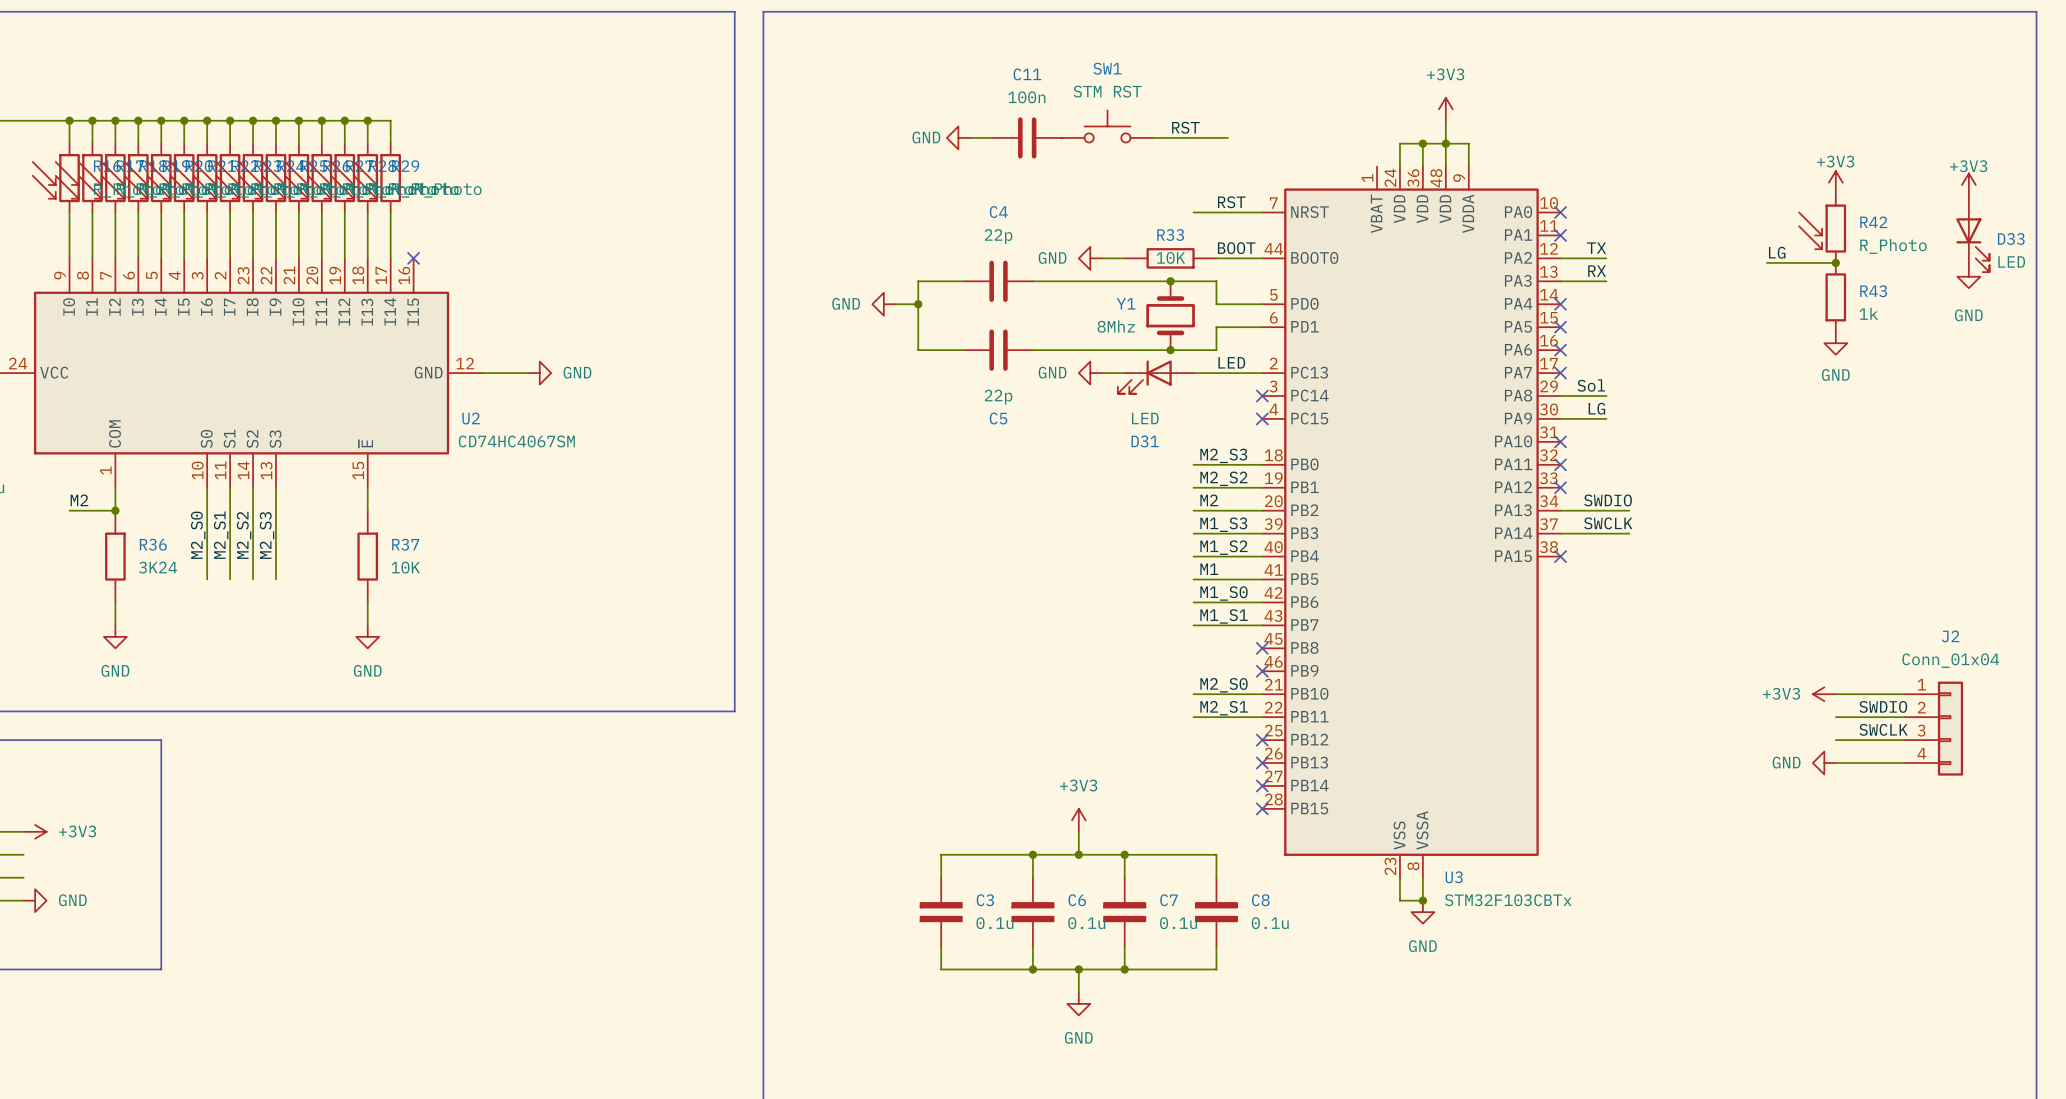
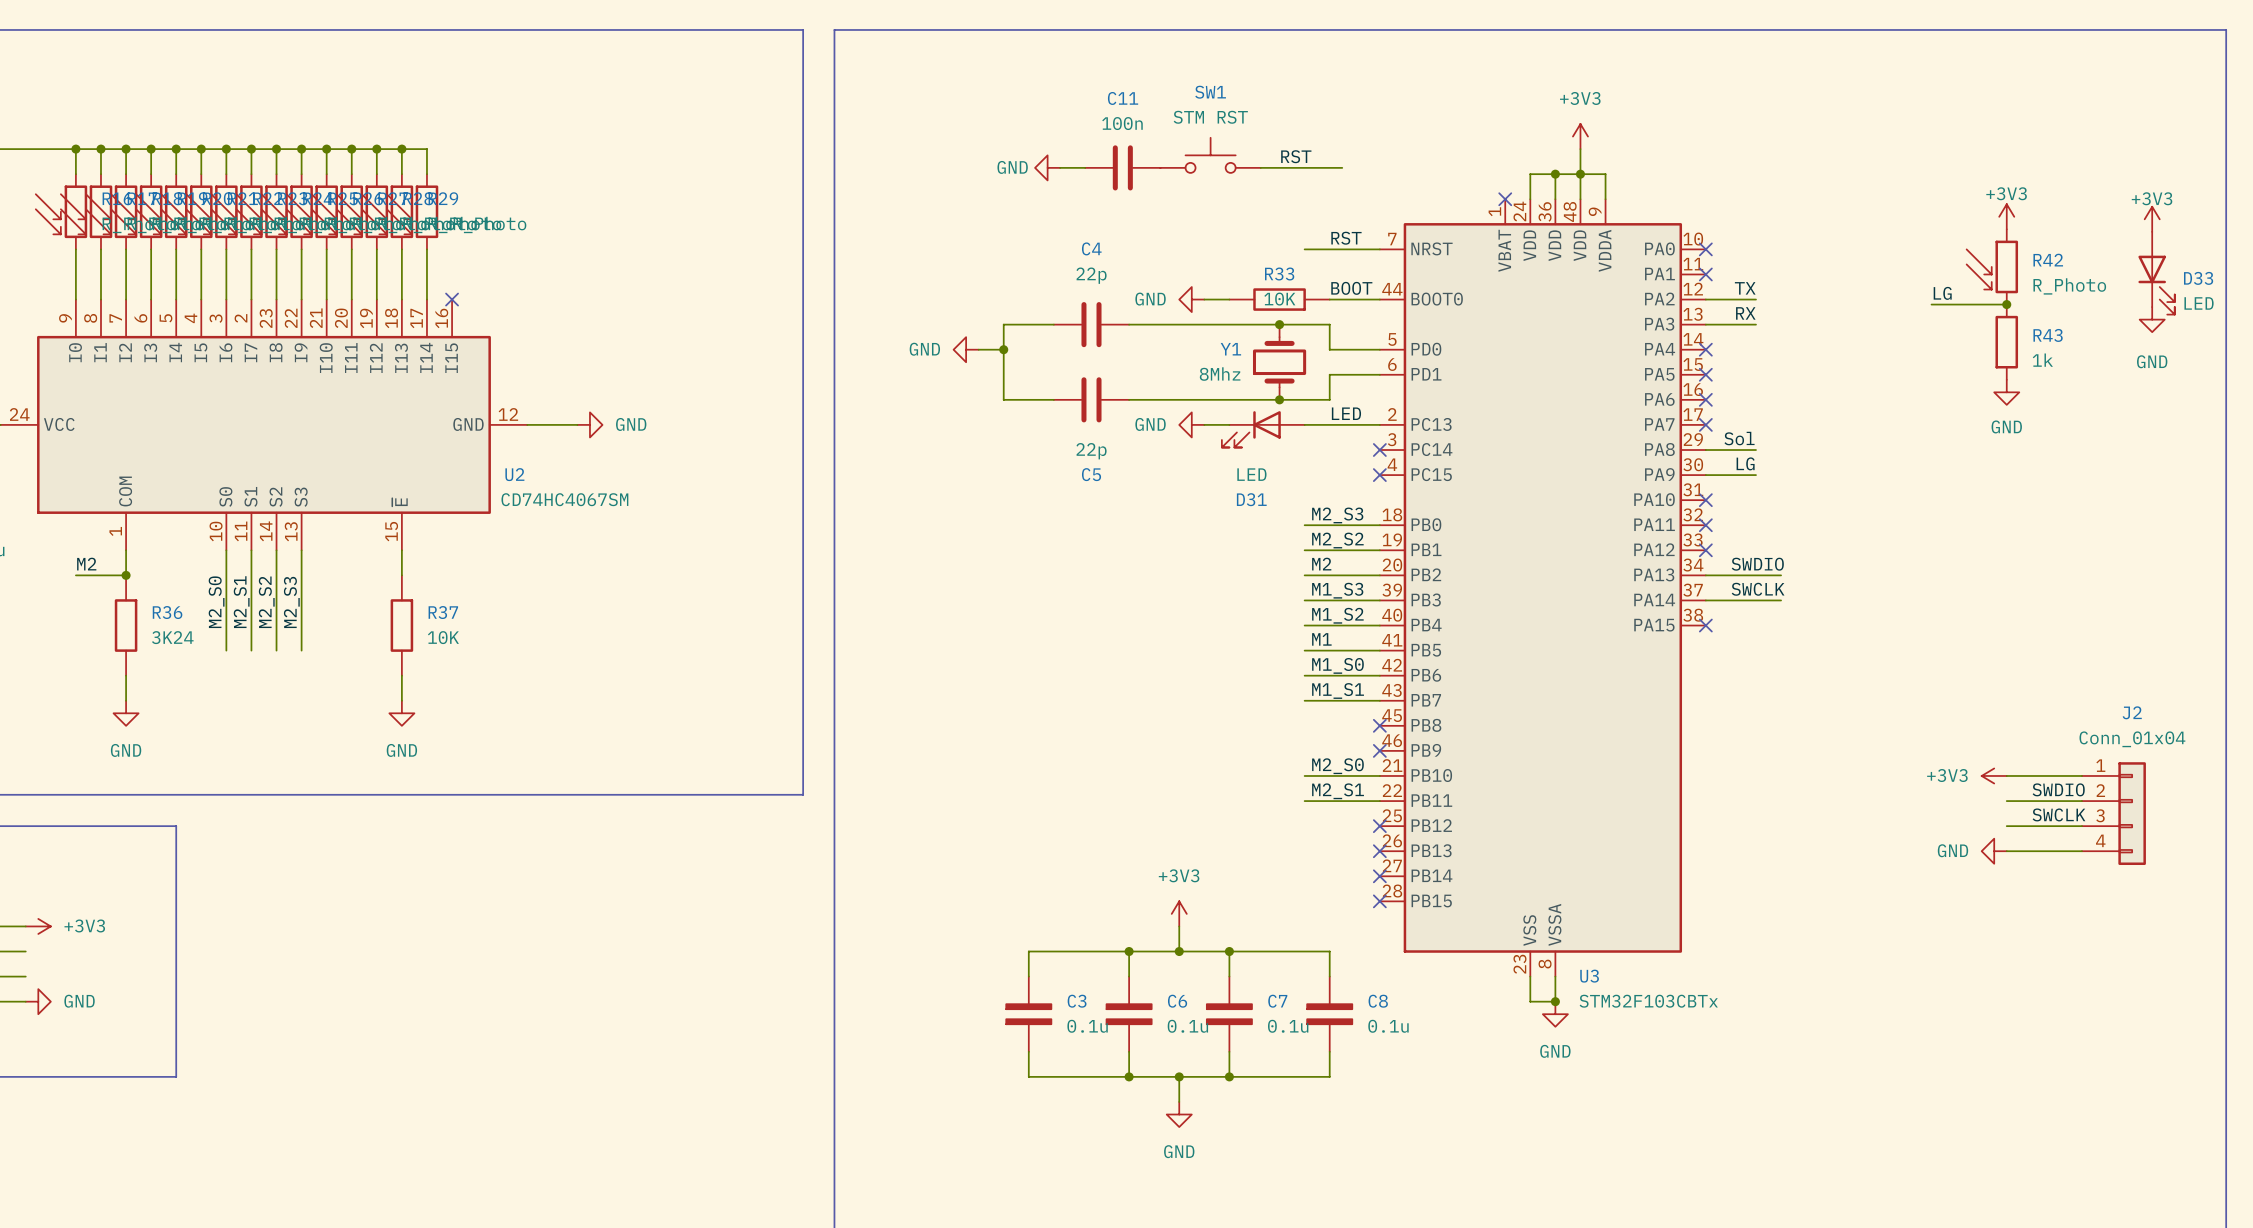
no-connect mark: none -> (1505, 199)

